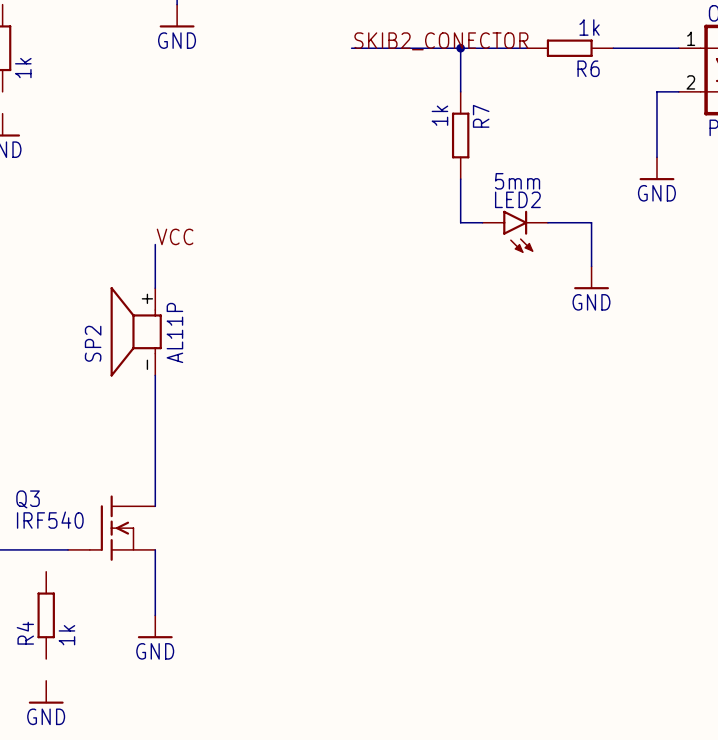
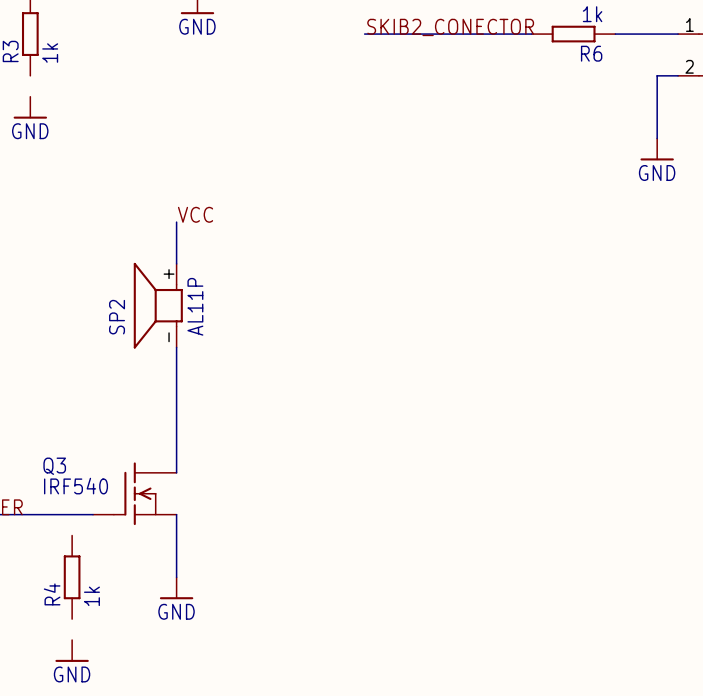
wire: (460, 48) (460, 91) -> none
junction: (460, 48) -> none
R7: 1k (460, 135) -> none
wire: (460, 179) (460, 222) (482, 222) -> none
wire: (547, 222) (591, 222) (591, 266) -> none
LED2: 5mm (515, 231) -> none
power symbol: GND (591, 277) -> none

